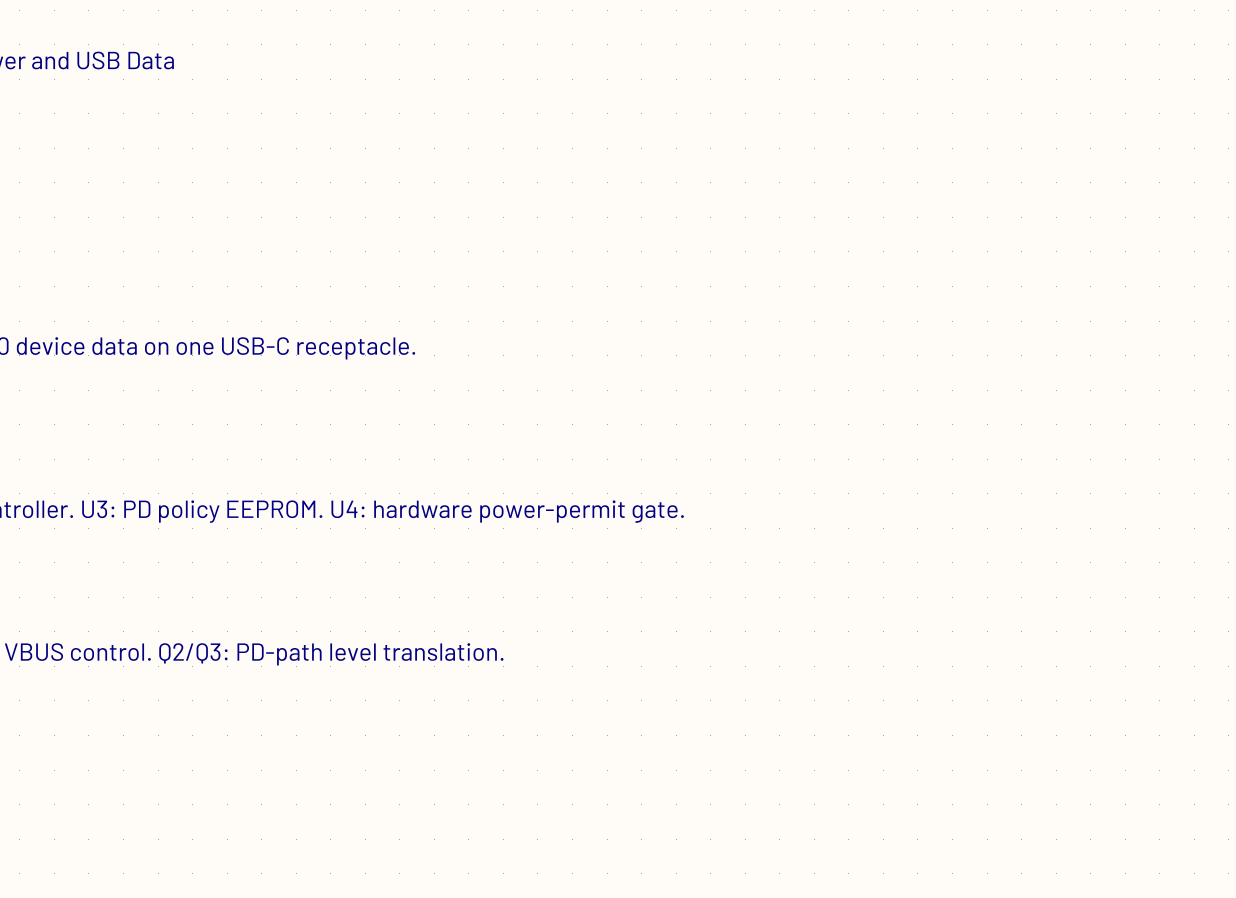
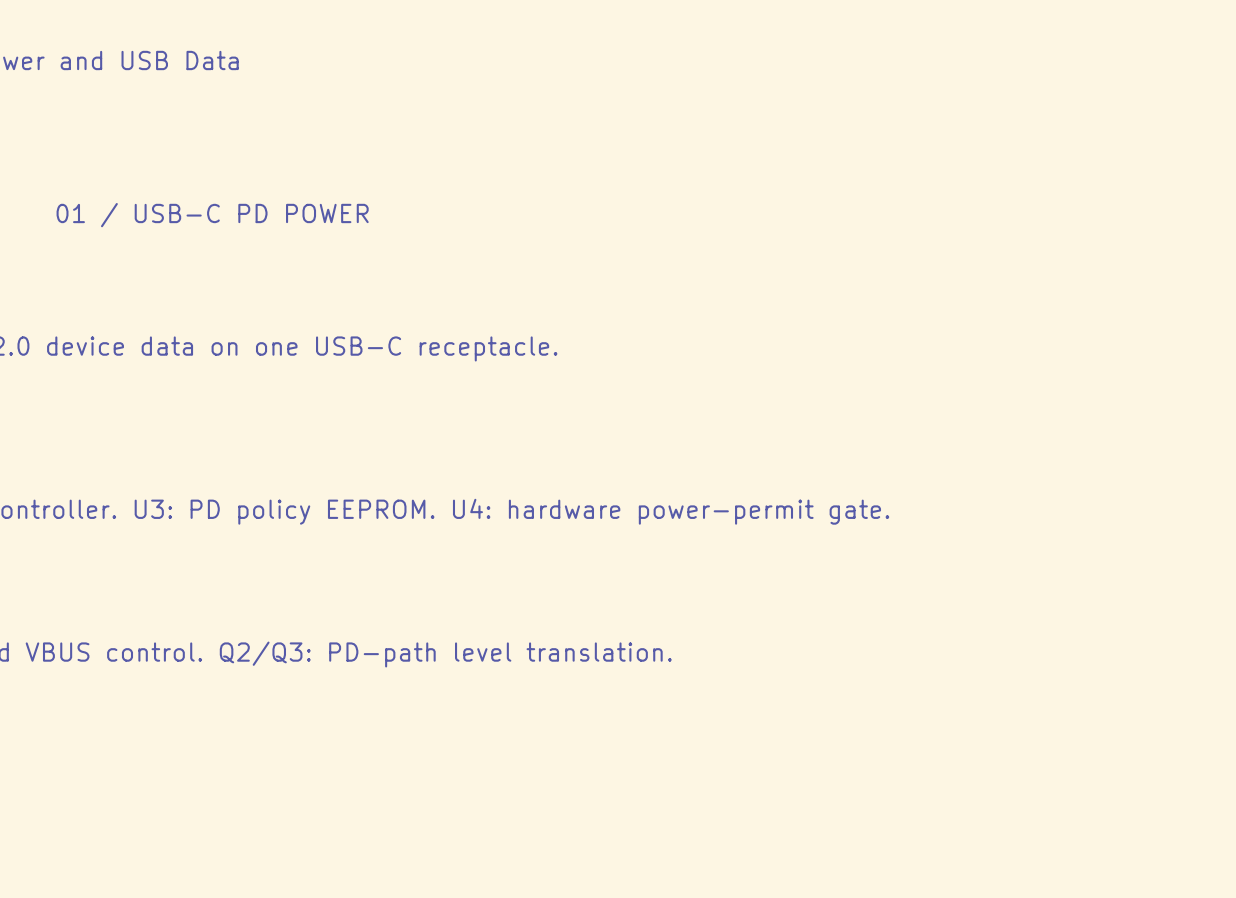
text: none -> 01 / USB-C PD POWER (212, 215)

